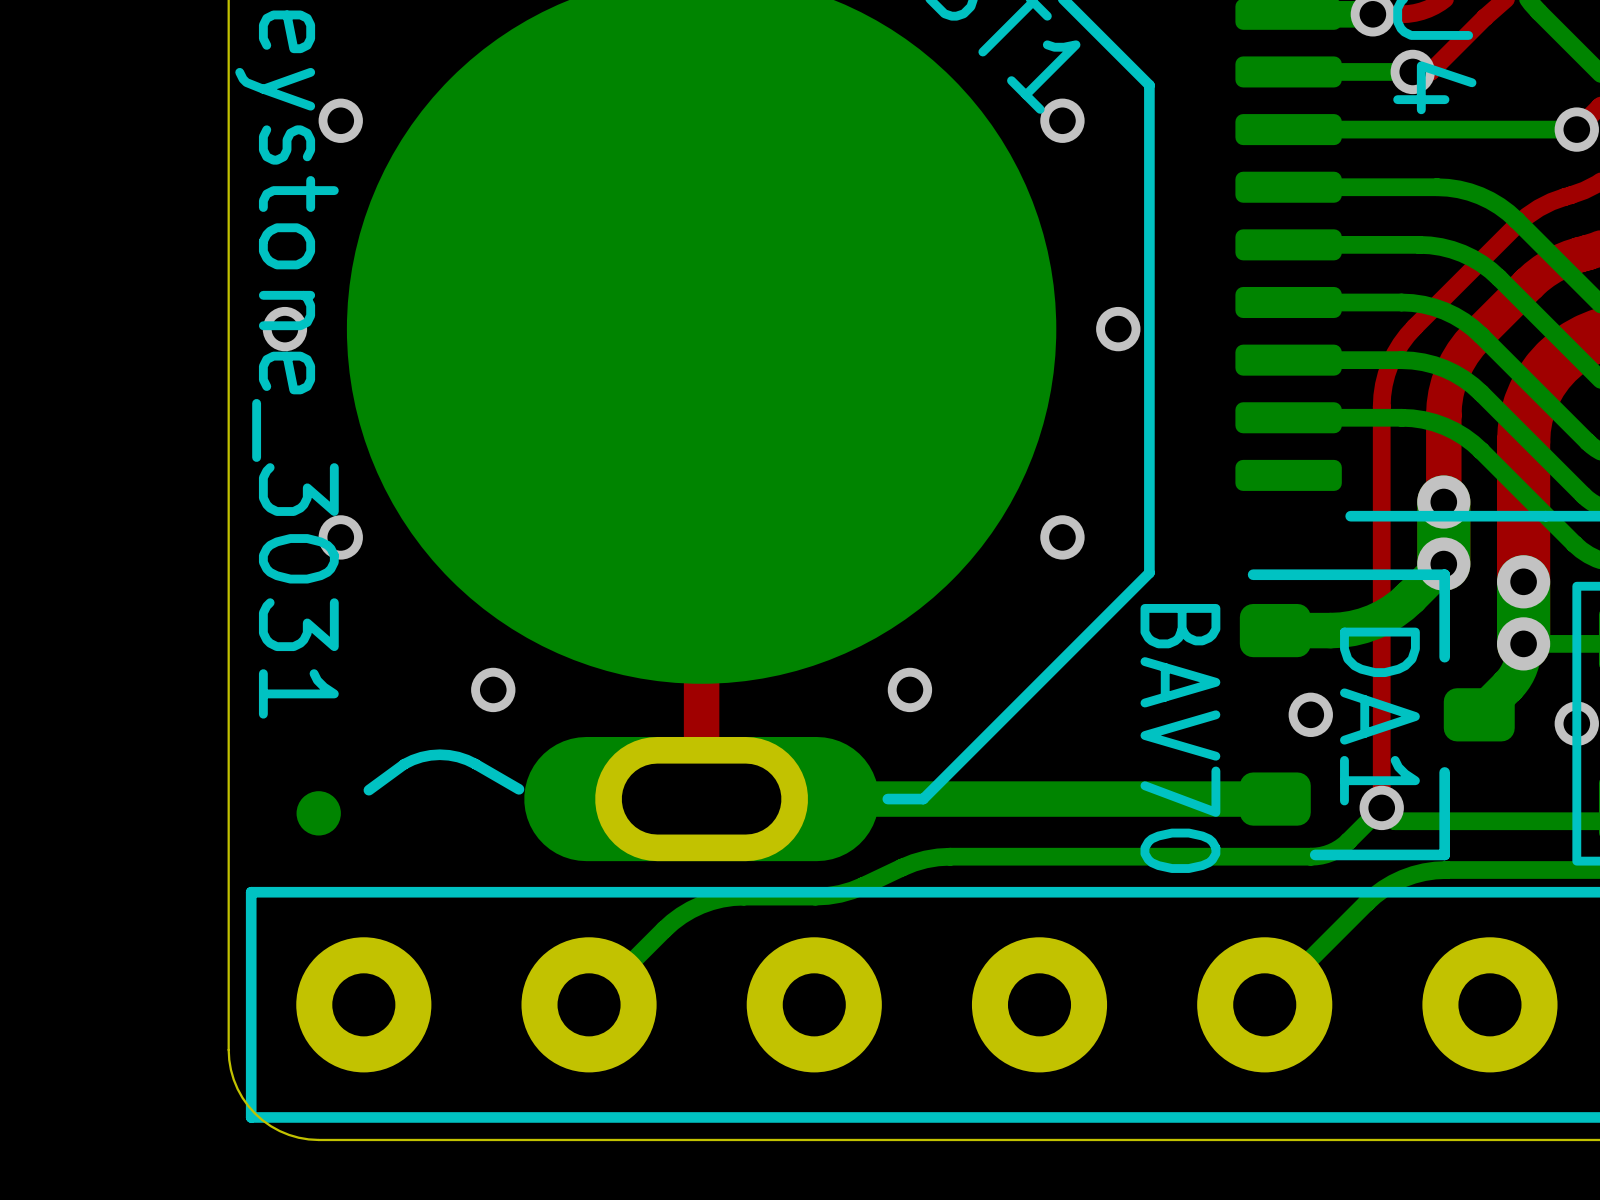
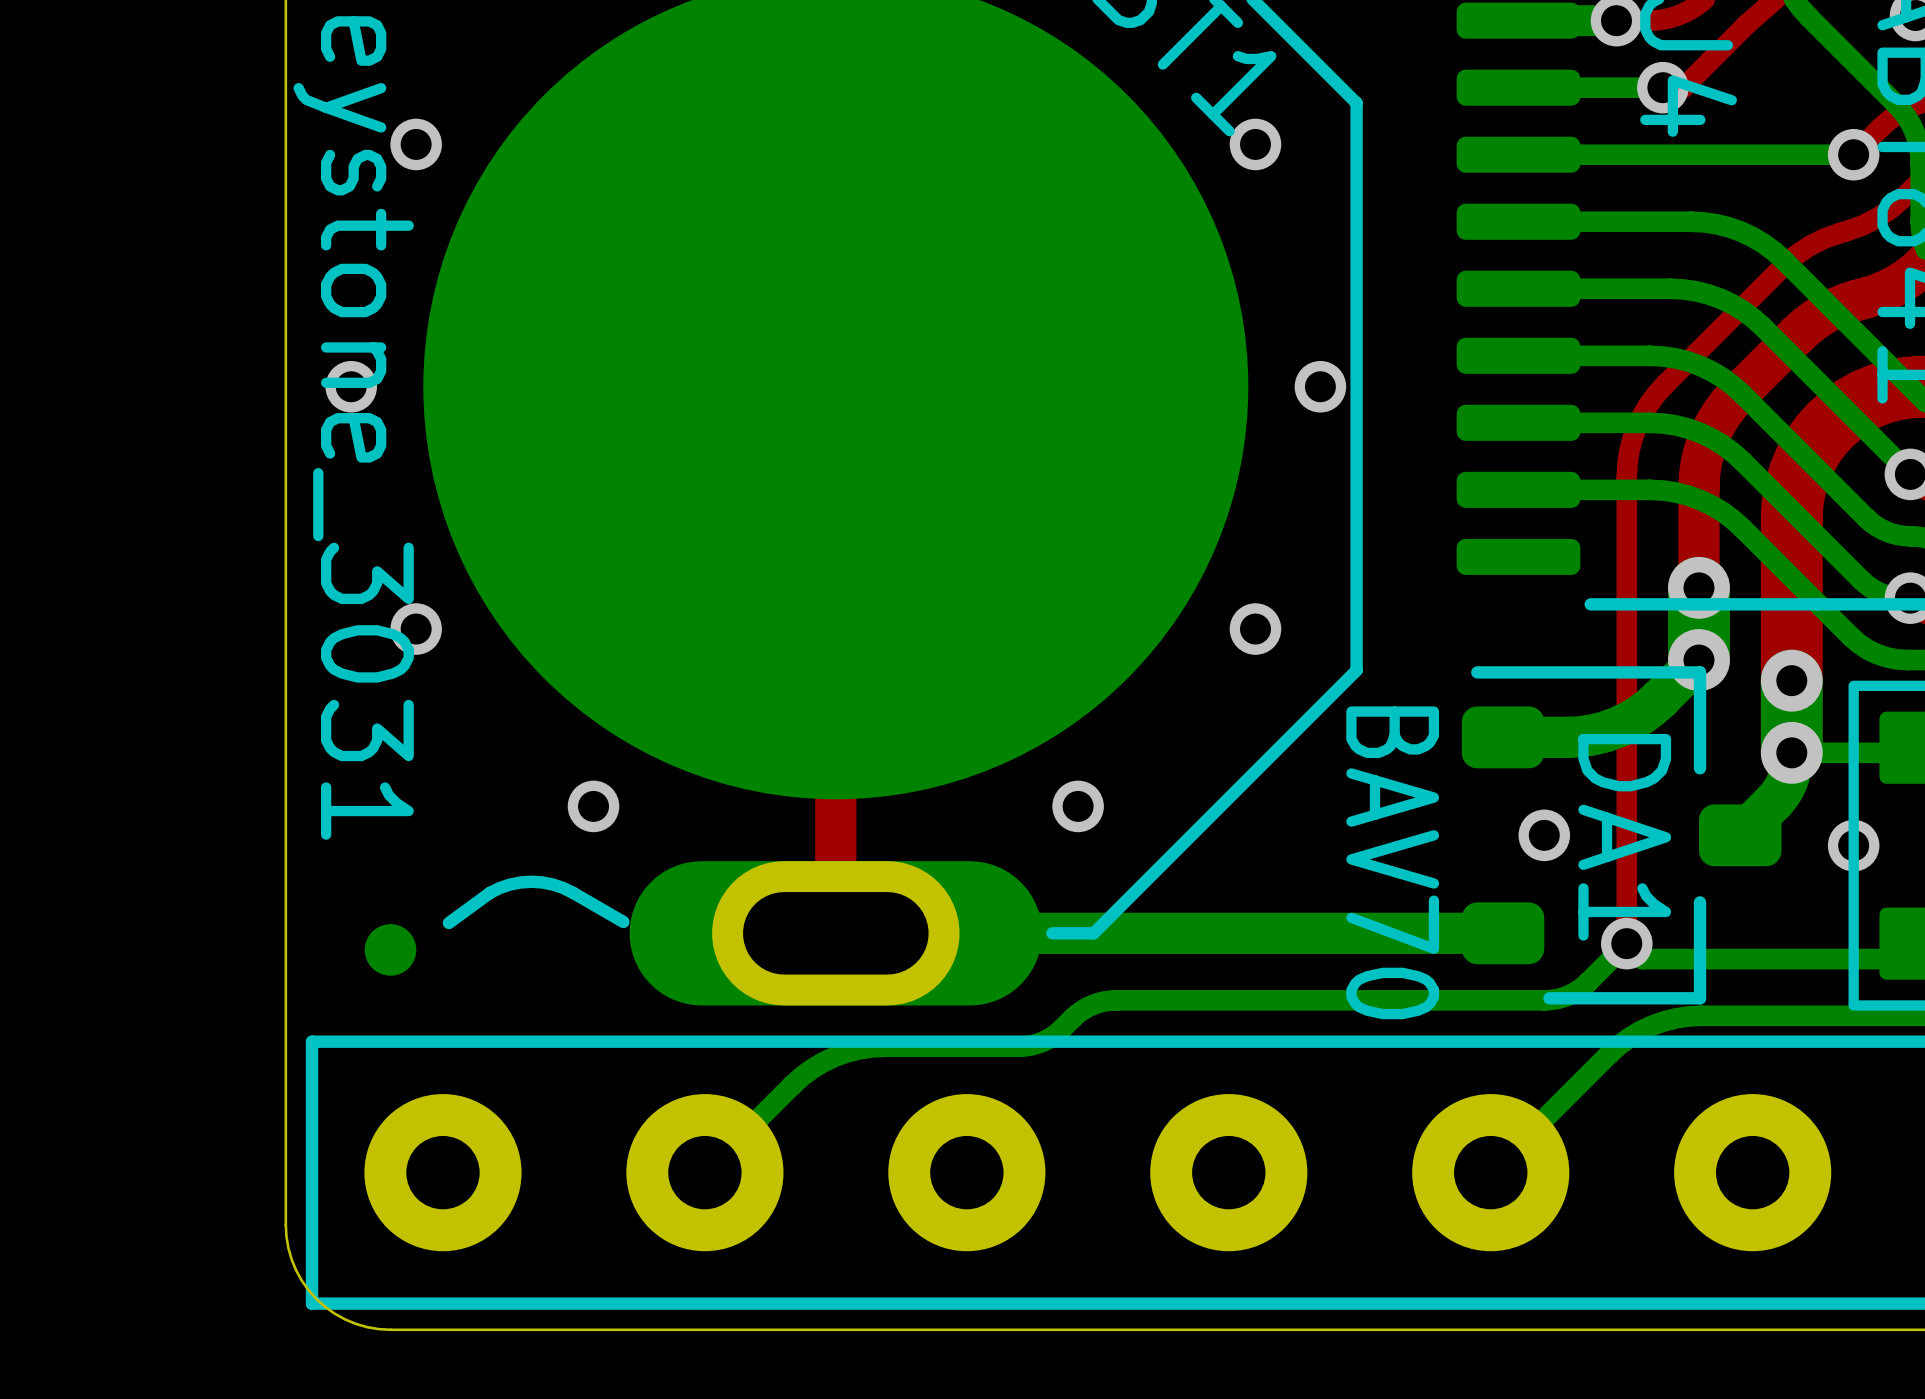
bottom track: (950, 856) (913, 862) (852, 890) (815, 896) -> (1125, 1000) (1104, 1001) (1087, 1007) (1052, 1036) (1036, 1044) (1018, 1046) (968, 1046)

